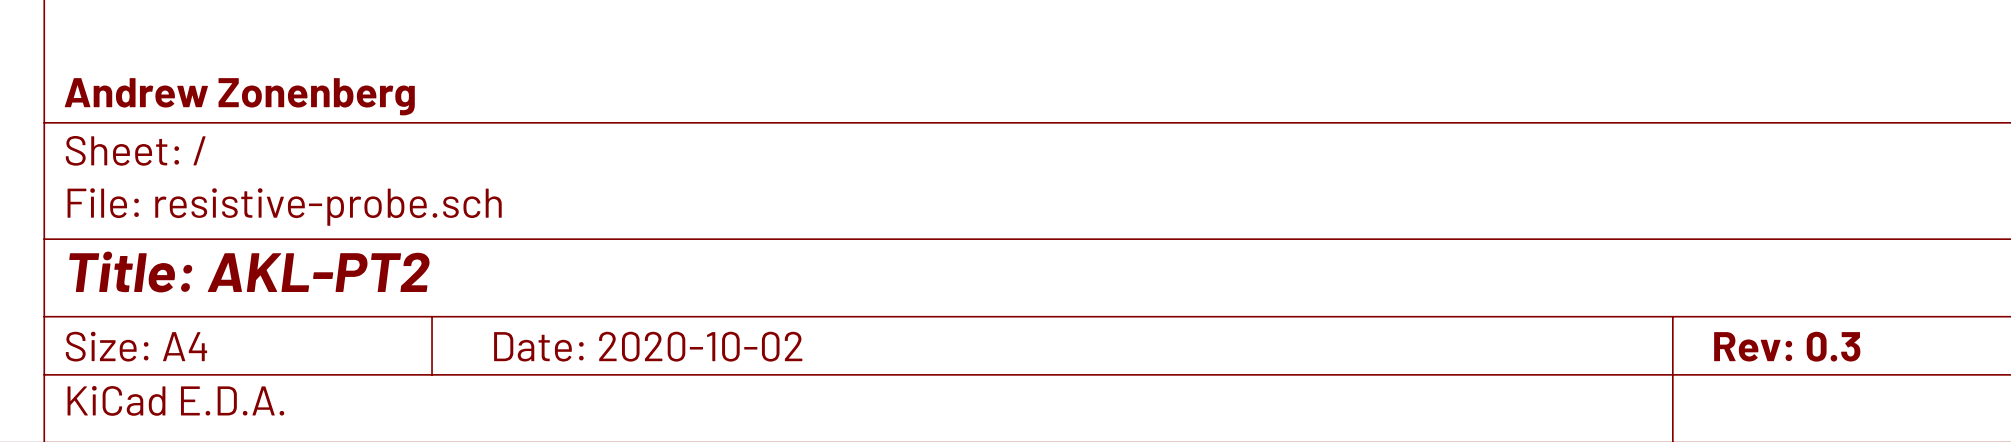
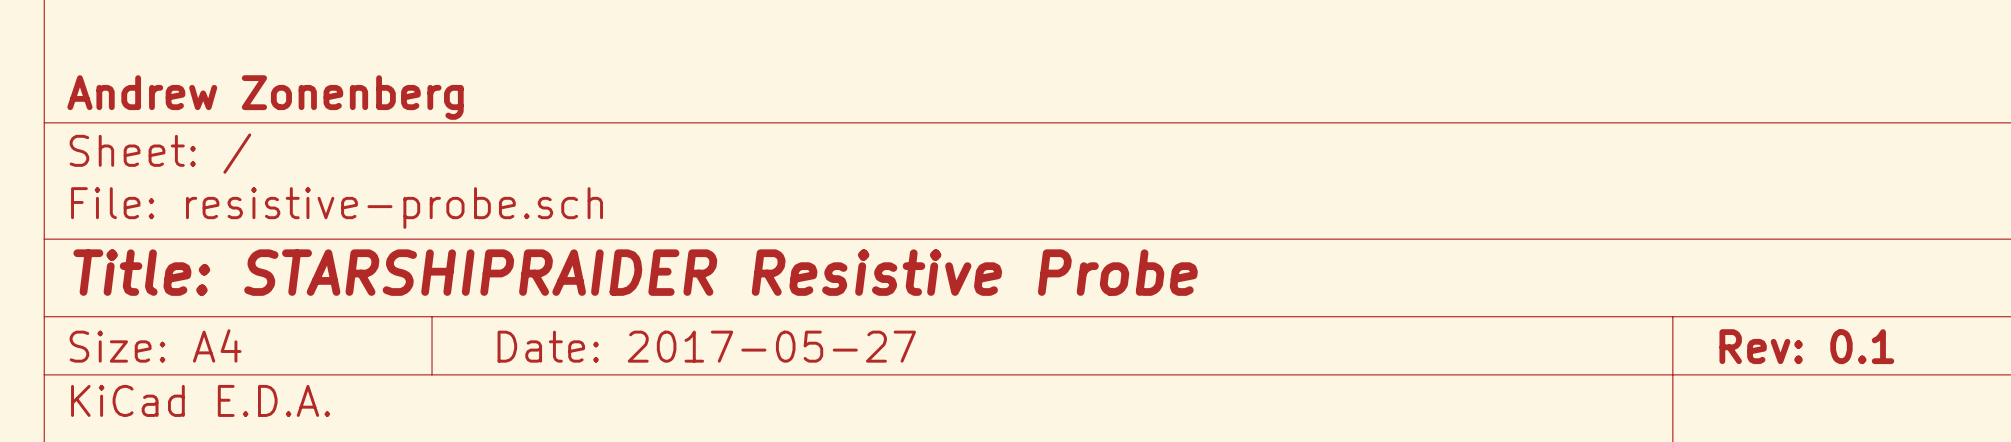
title block: Title: AKL-PT2 (249, 272) -> Title: STARSHIPRAIDER Resistive Probe (635, 272)
title block: Date: 2020-10-02 (648, 346) -> Date: 2017-05-27 (706, 346)
title block: Rev: 0.3 (1787, 346) -> Rev: 0.1 (1806, 346)

